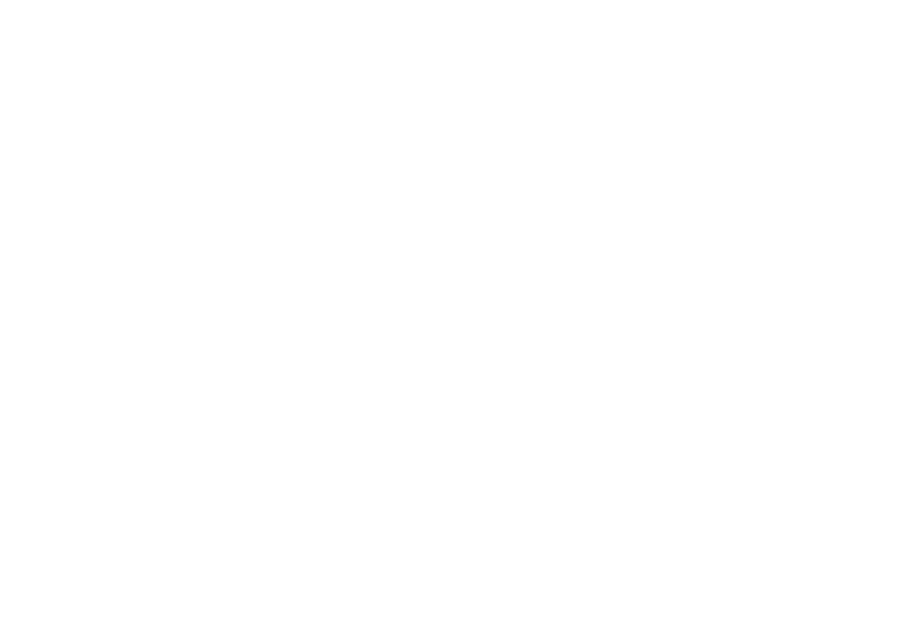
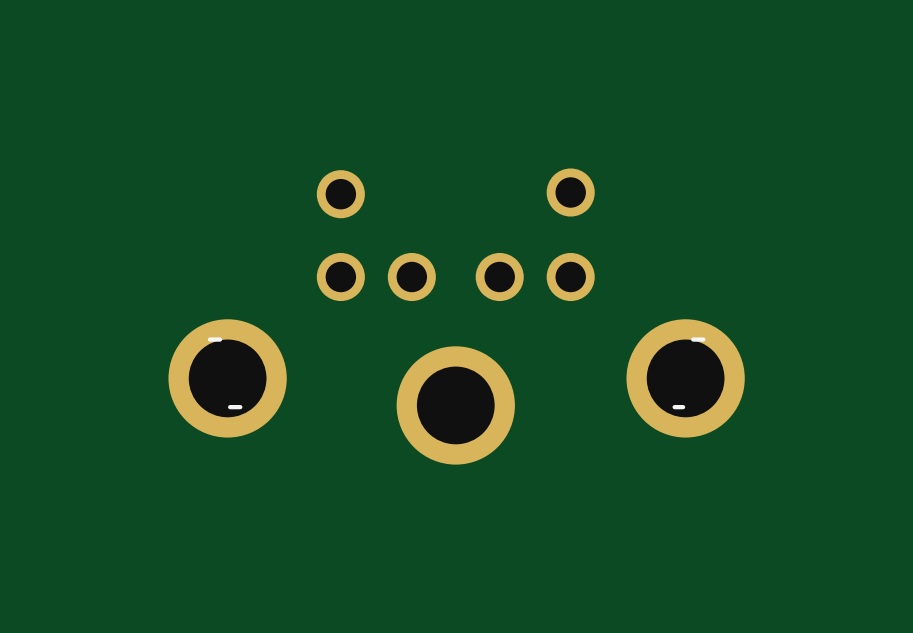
part: none -> (456, 316)

